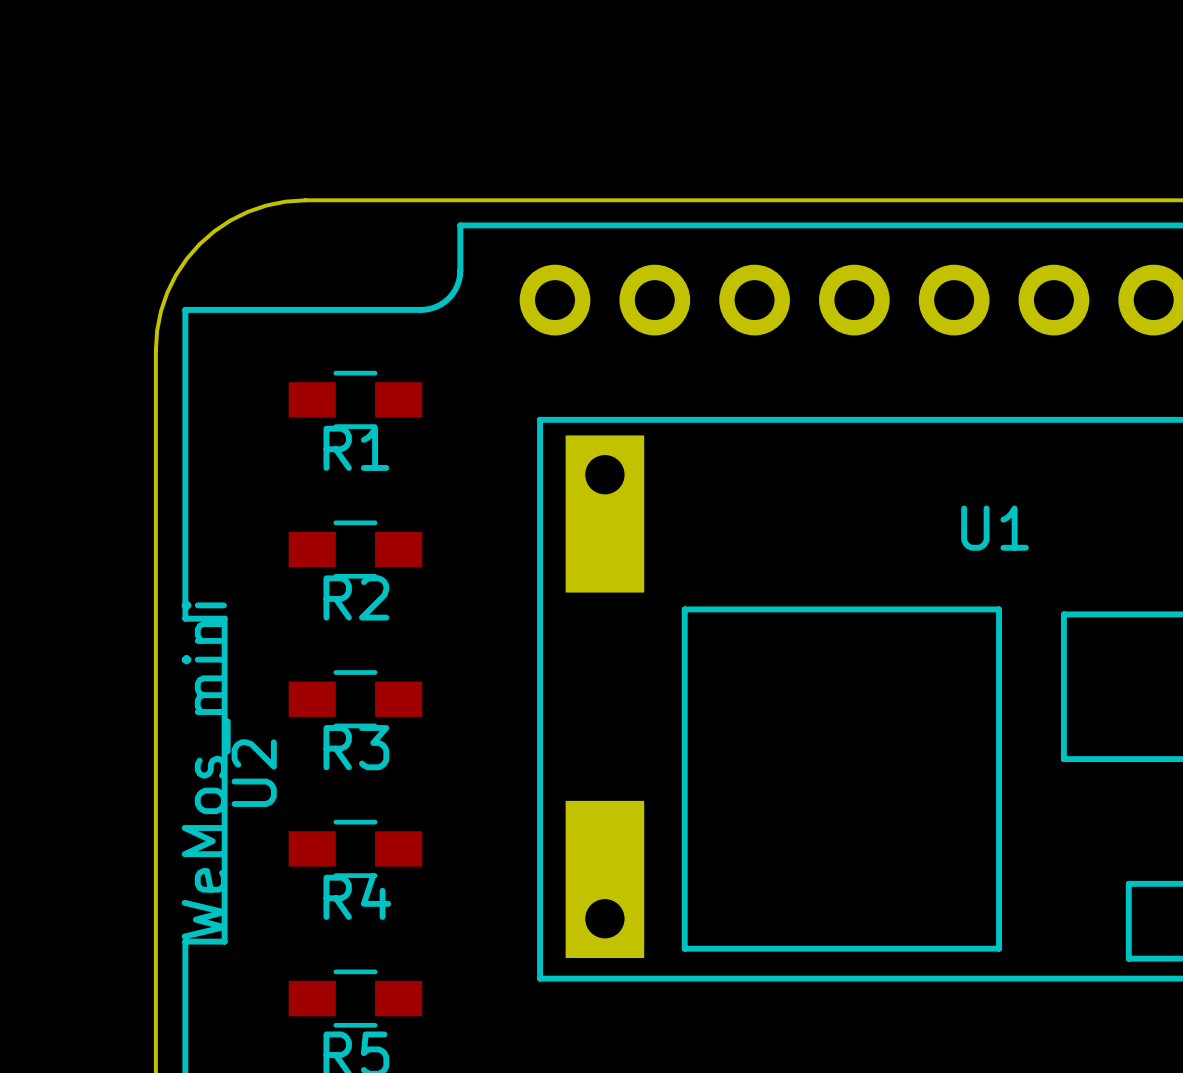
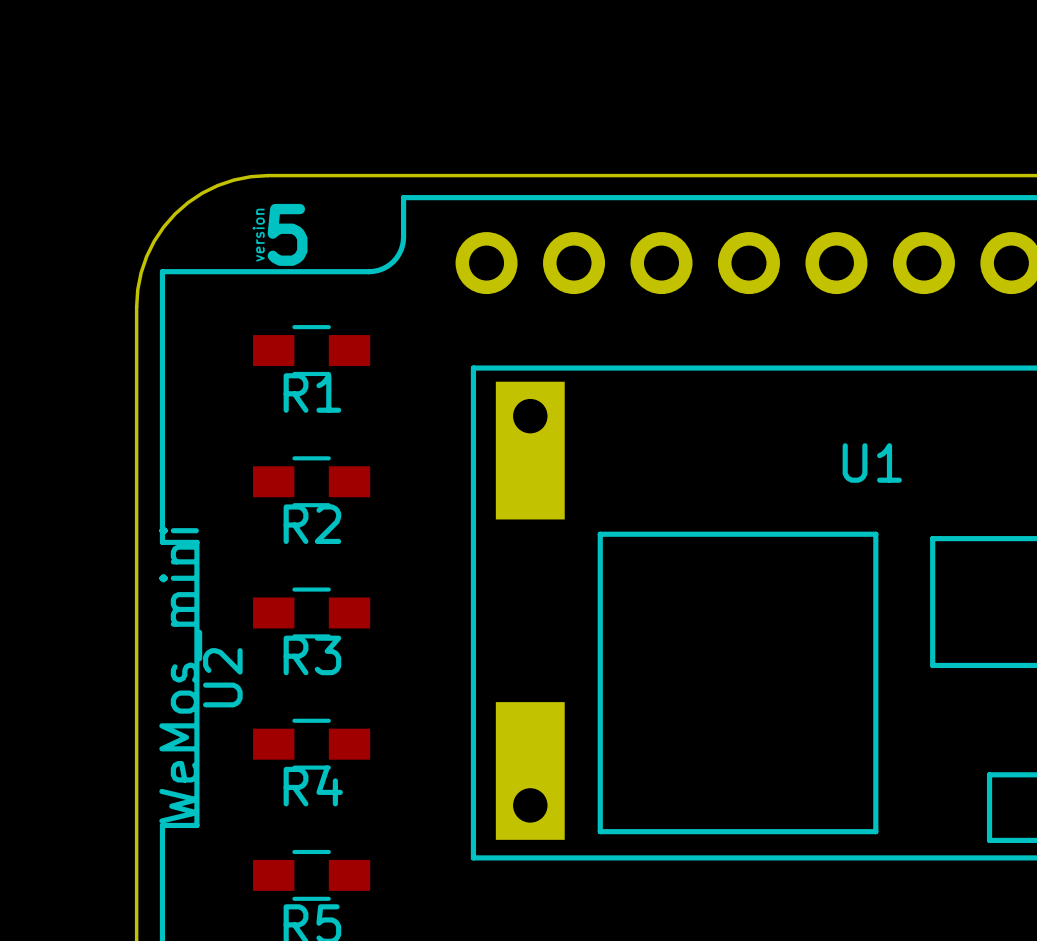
text: none -> 5 (287, 234)
text: none -> version (258, 235)

